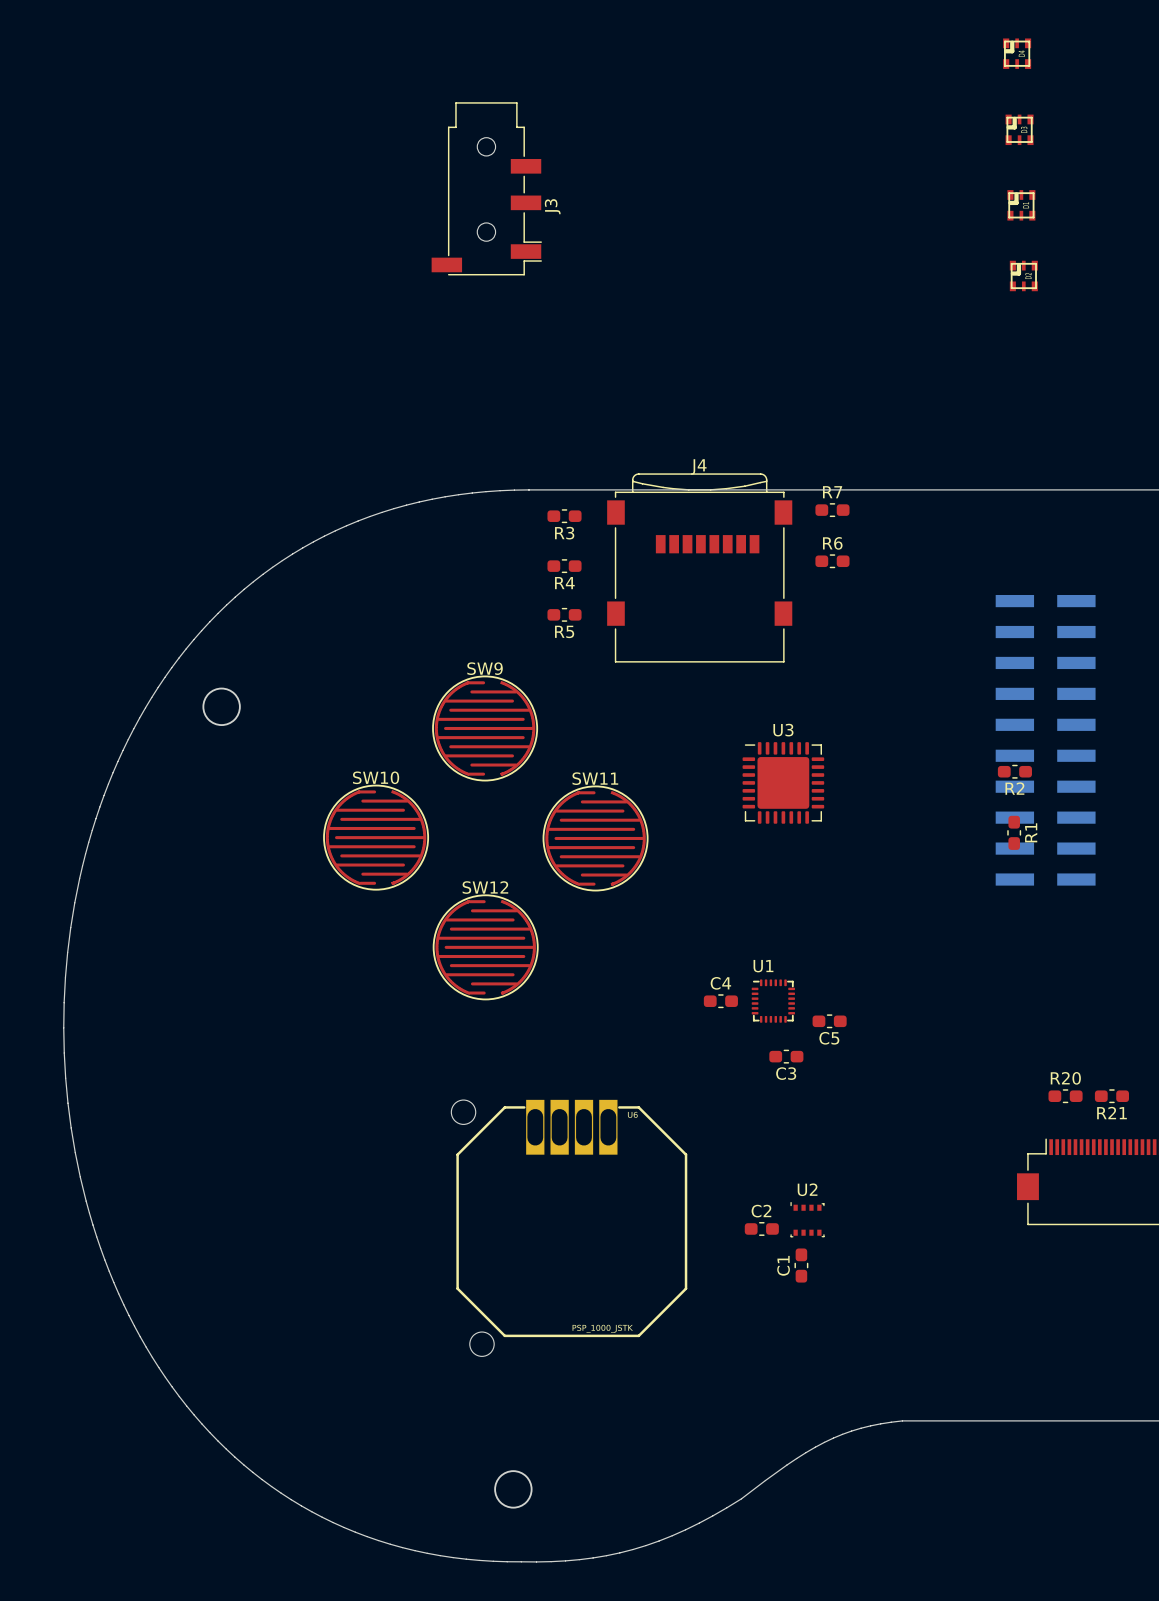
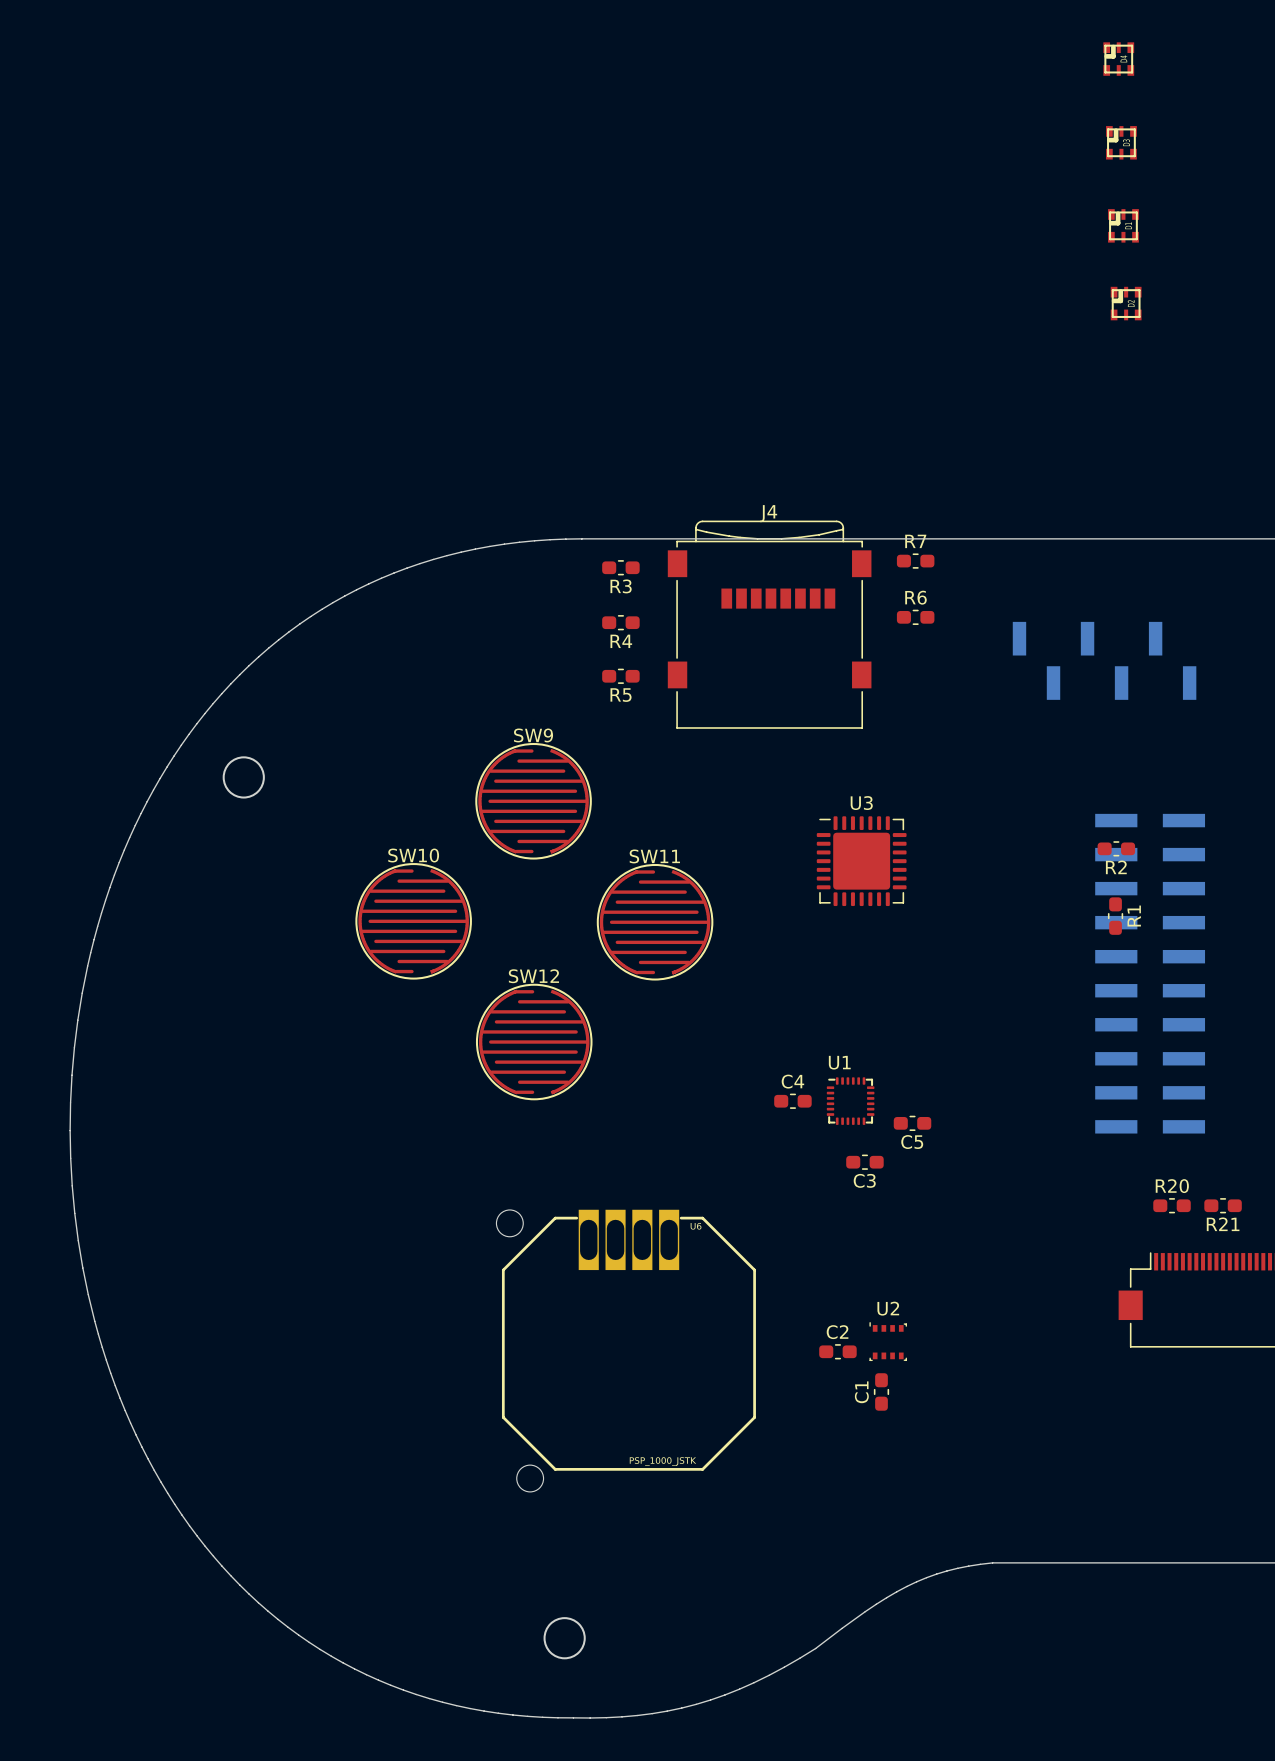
J3: (486, 188) -> none
part: none -> (1104, 660)
part position: (1045, 740) -> (1150, 973)

